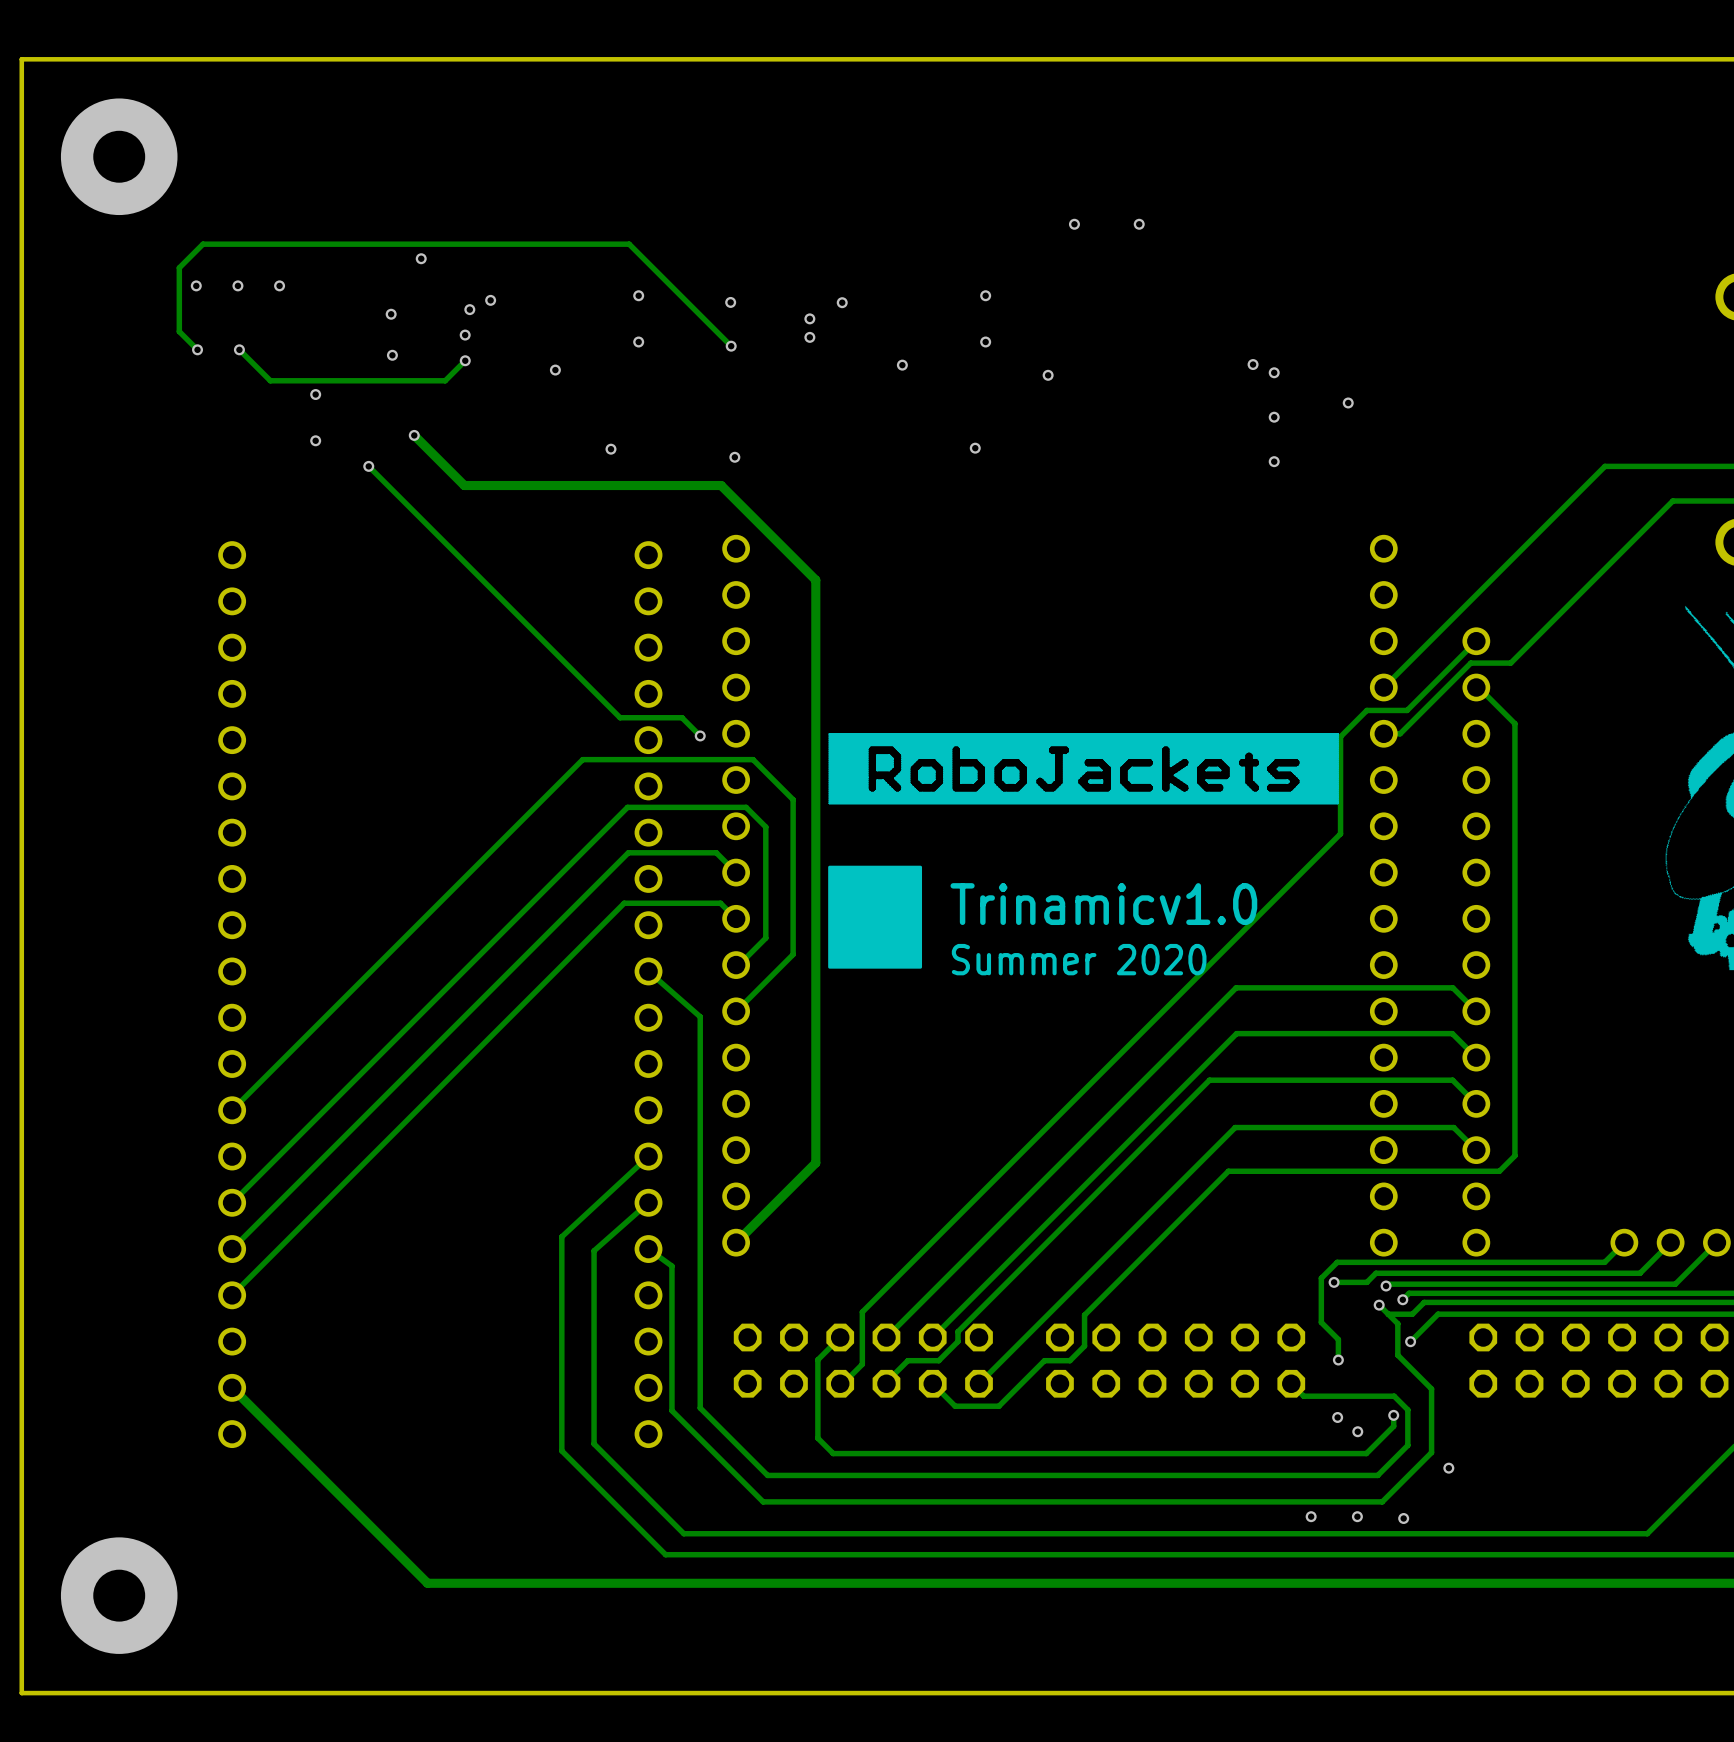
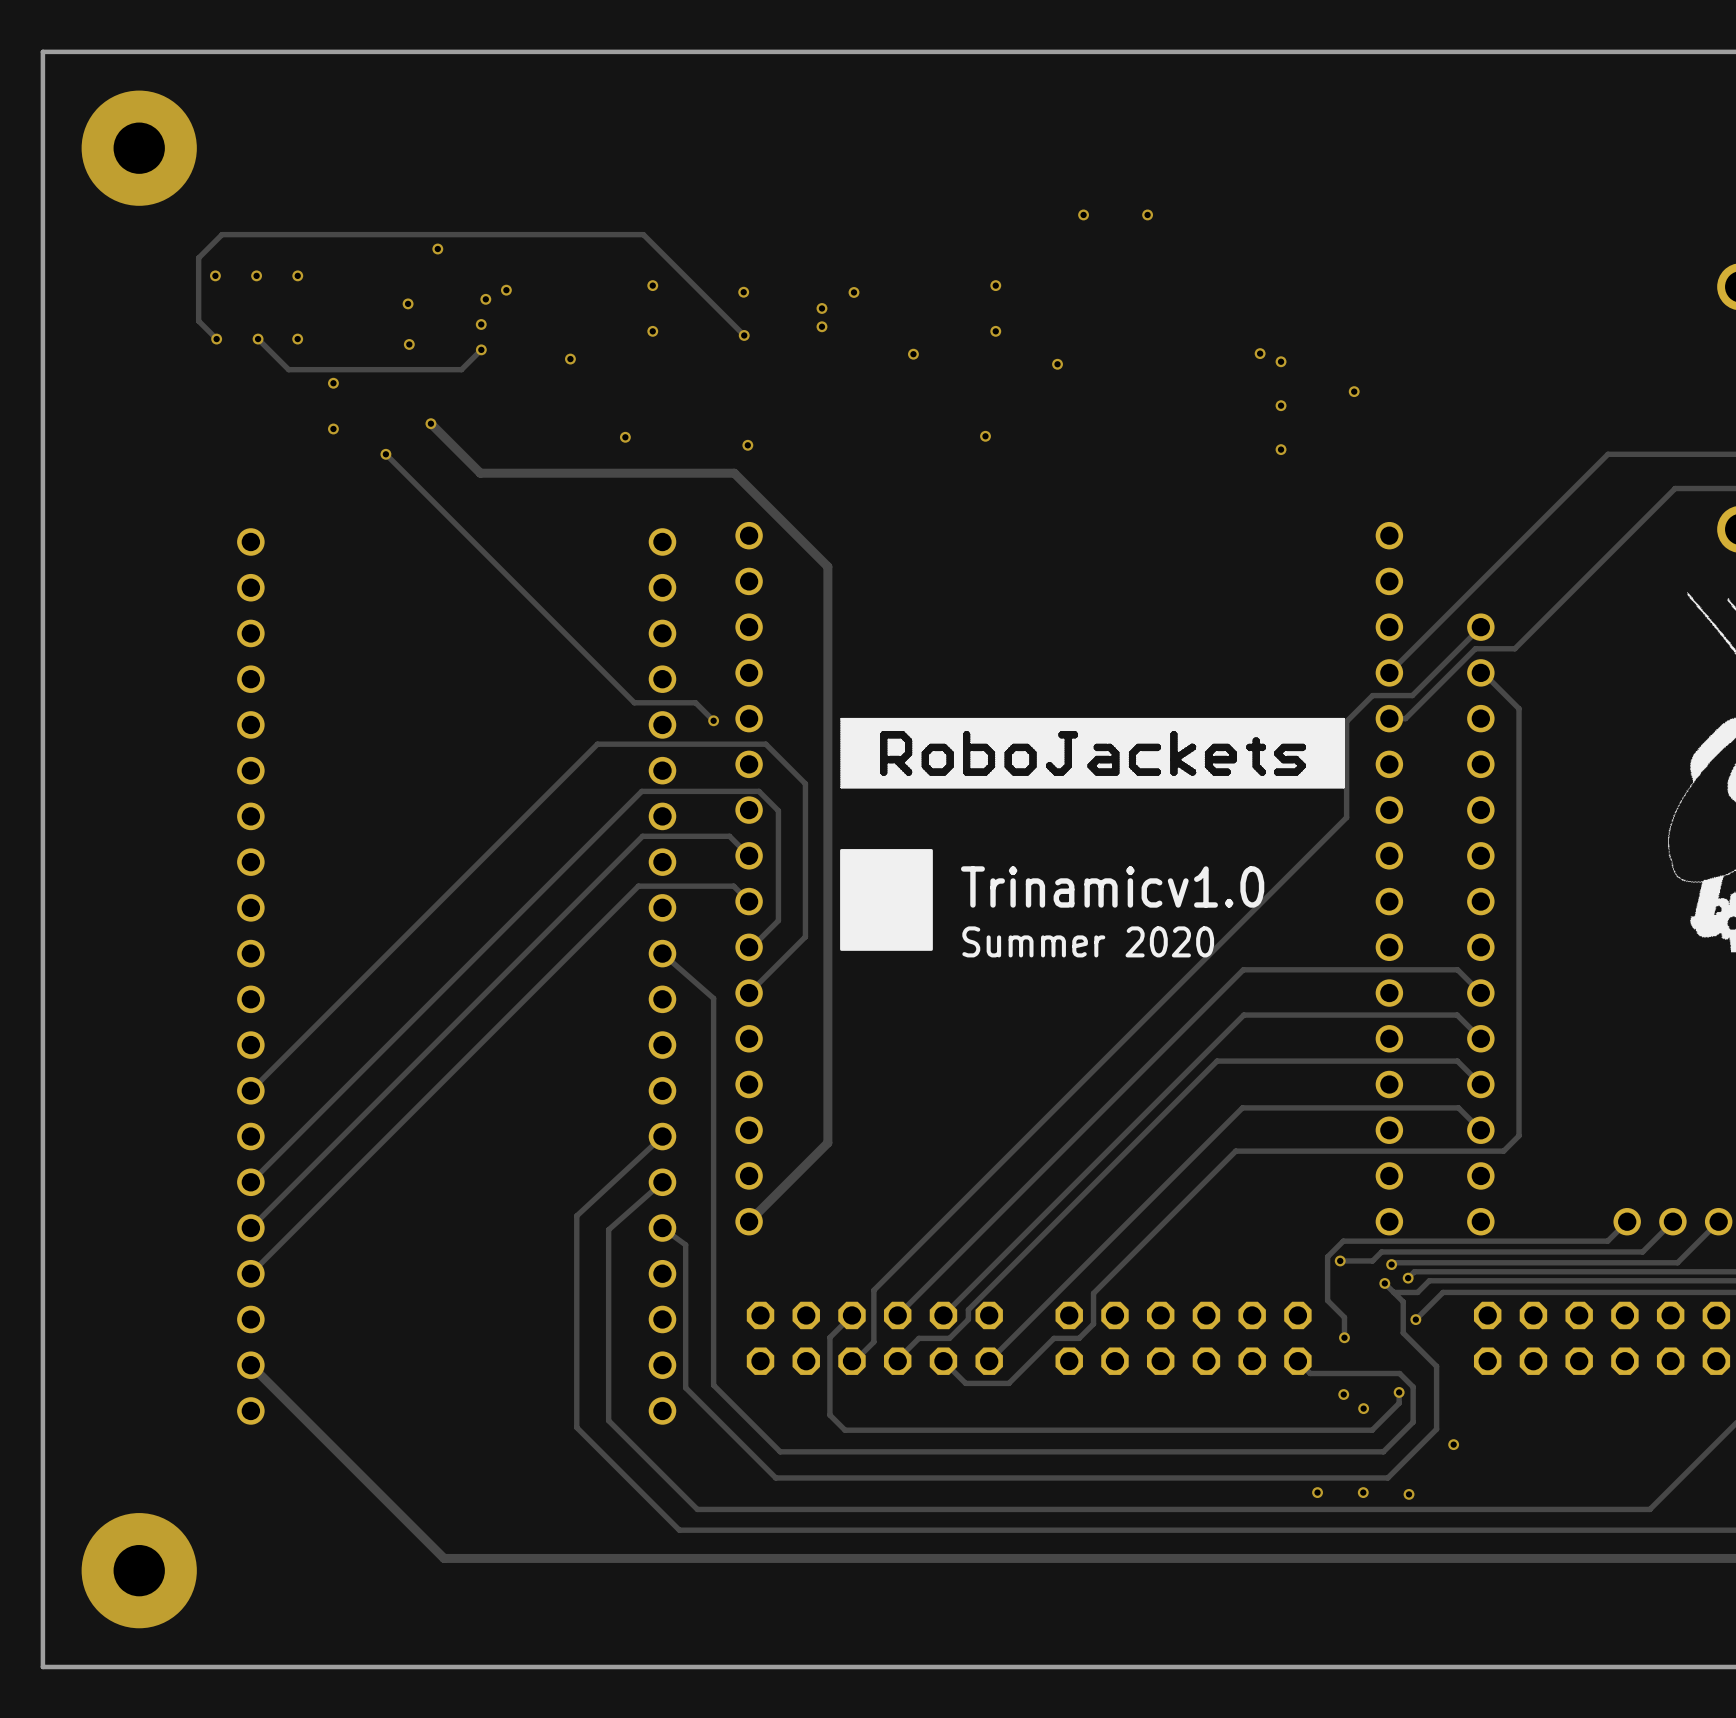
via: none -> (297, 339)

